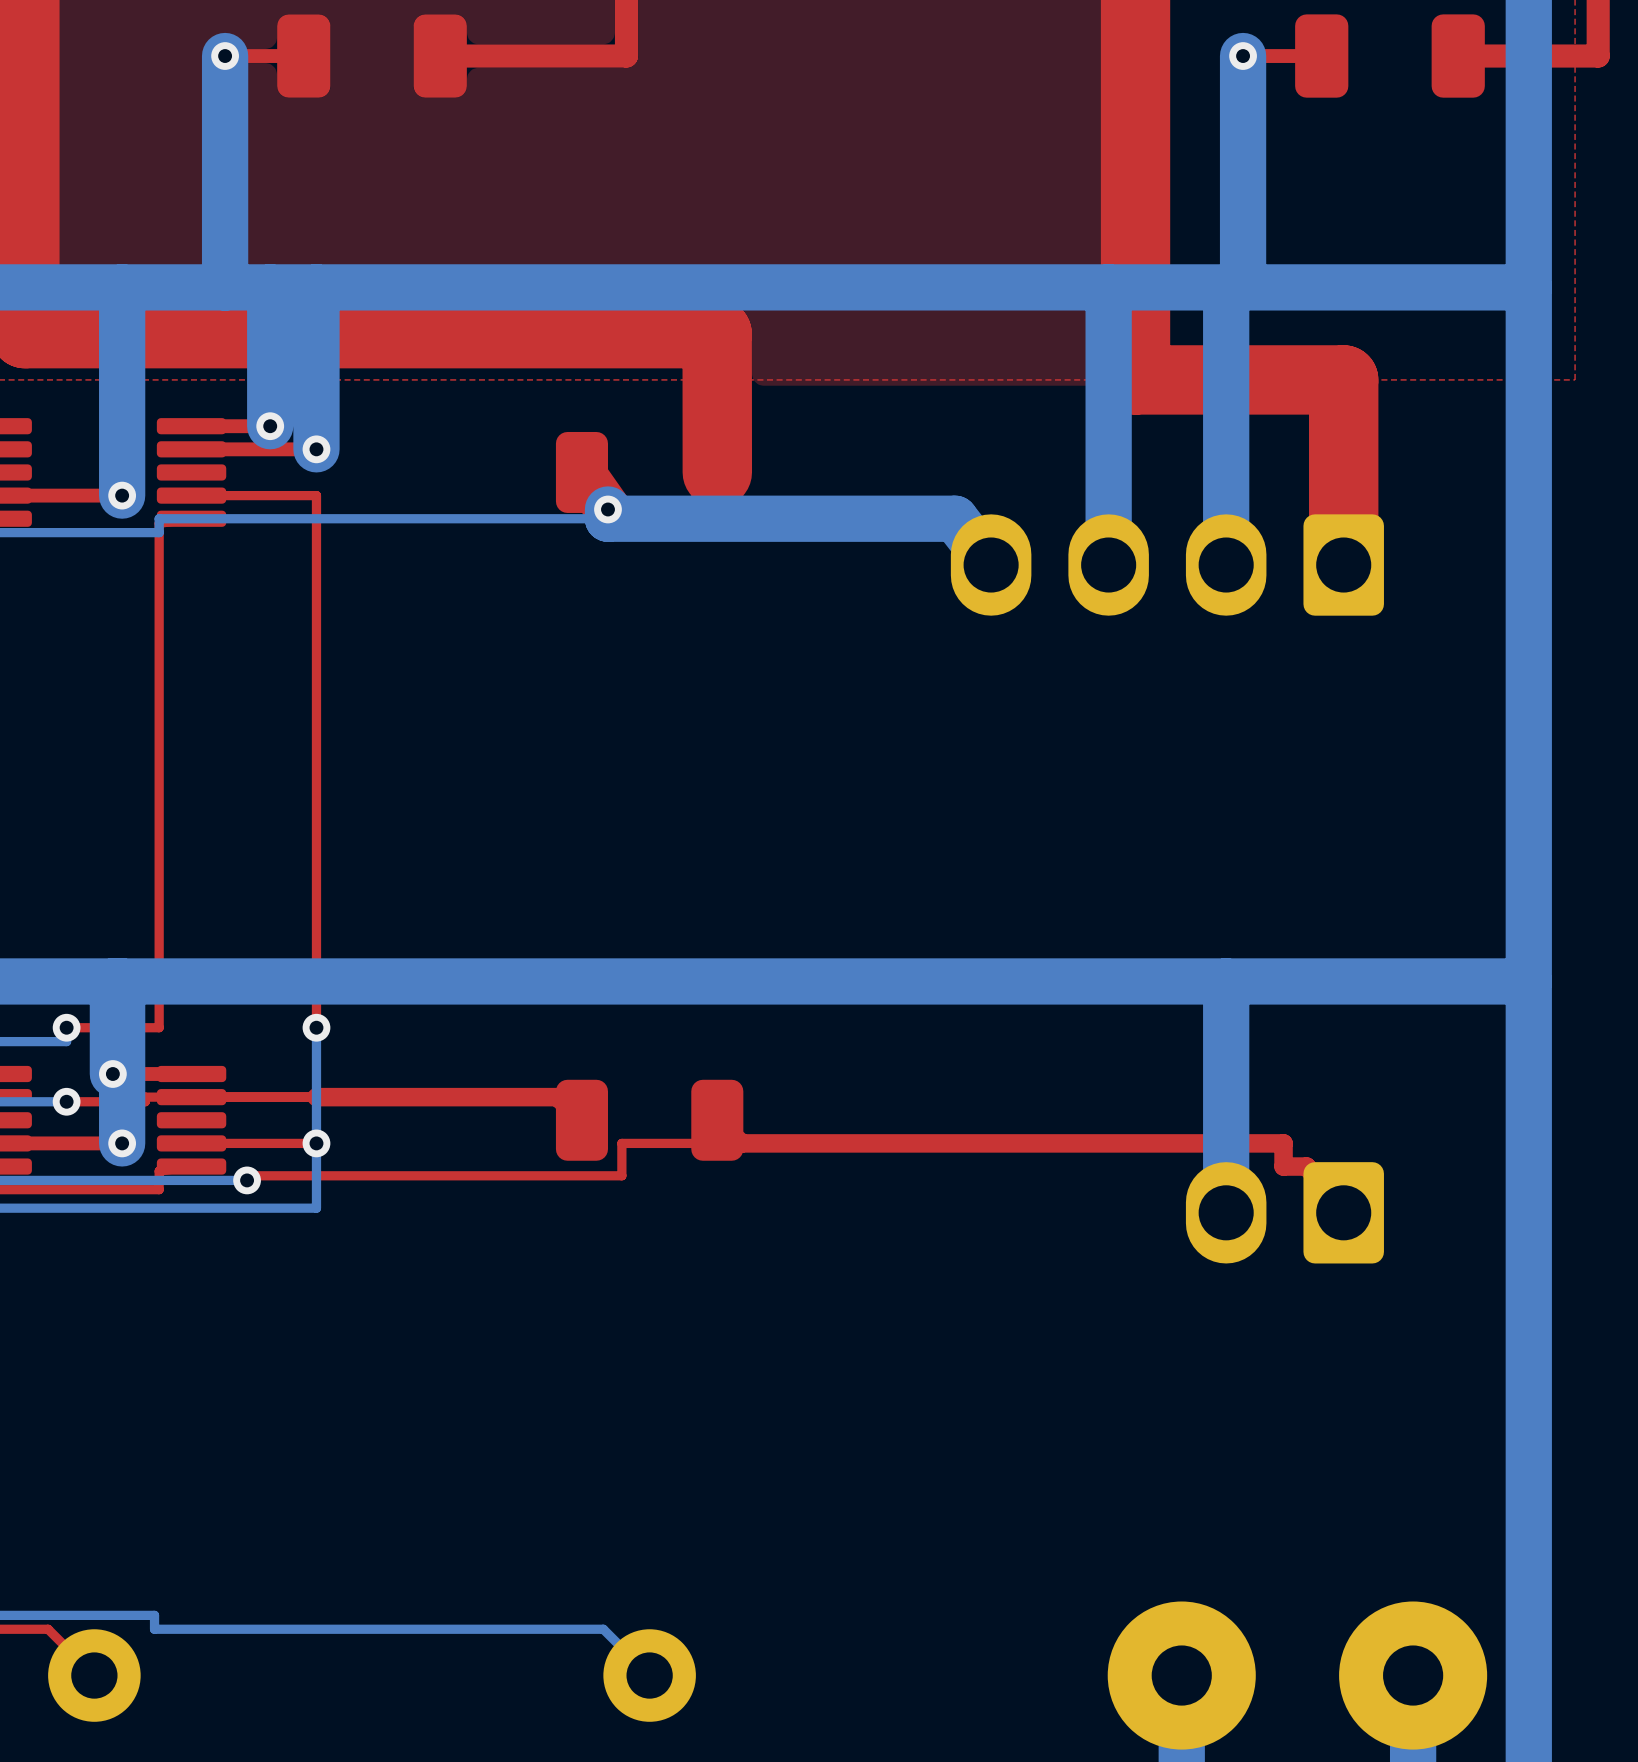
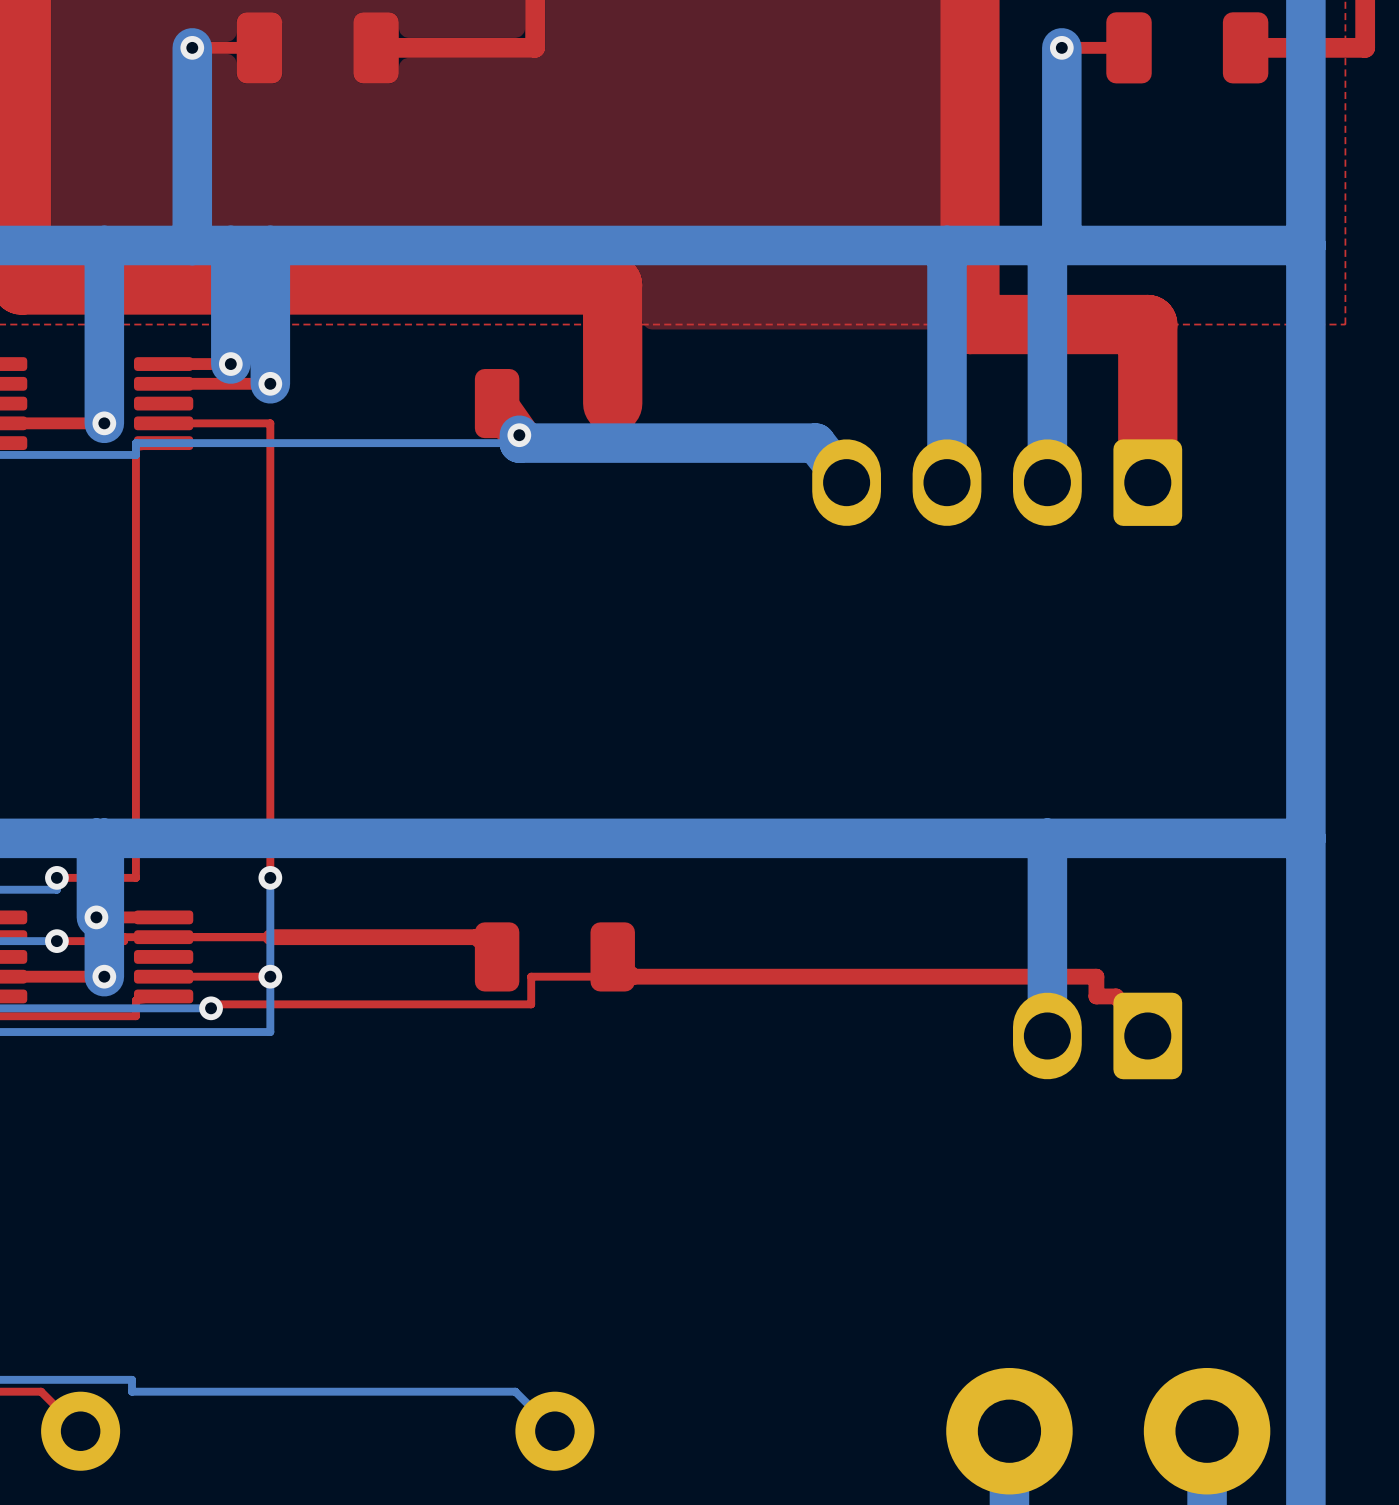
part footprint: [1107, 1601, 1488, 1750] -> [946, 1367, 1271, 1495]

